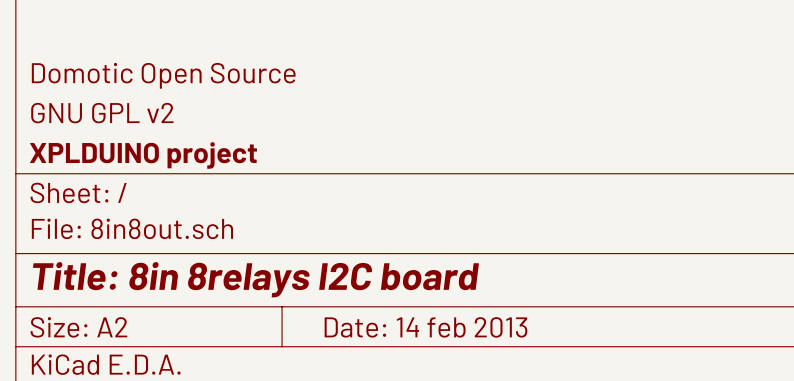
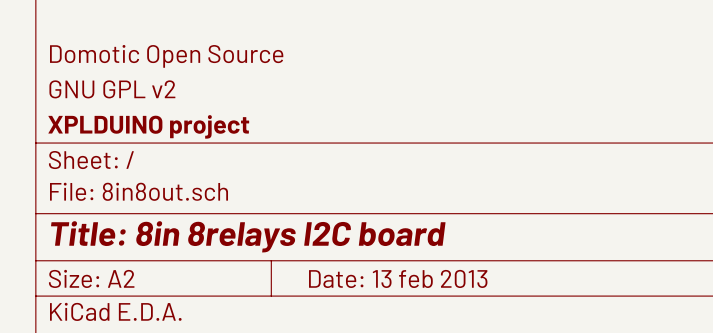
title block: Date: 14 feb 2013 (425, 327) -> Date: 13 feb 2013 (398, 278)

